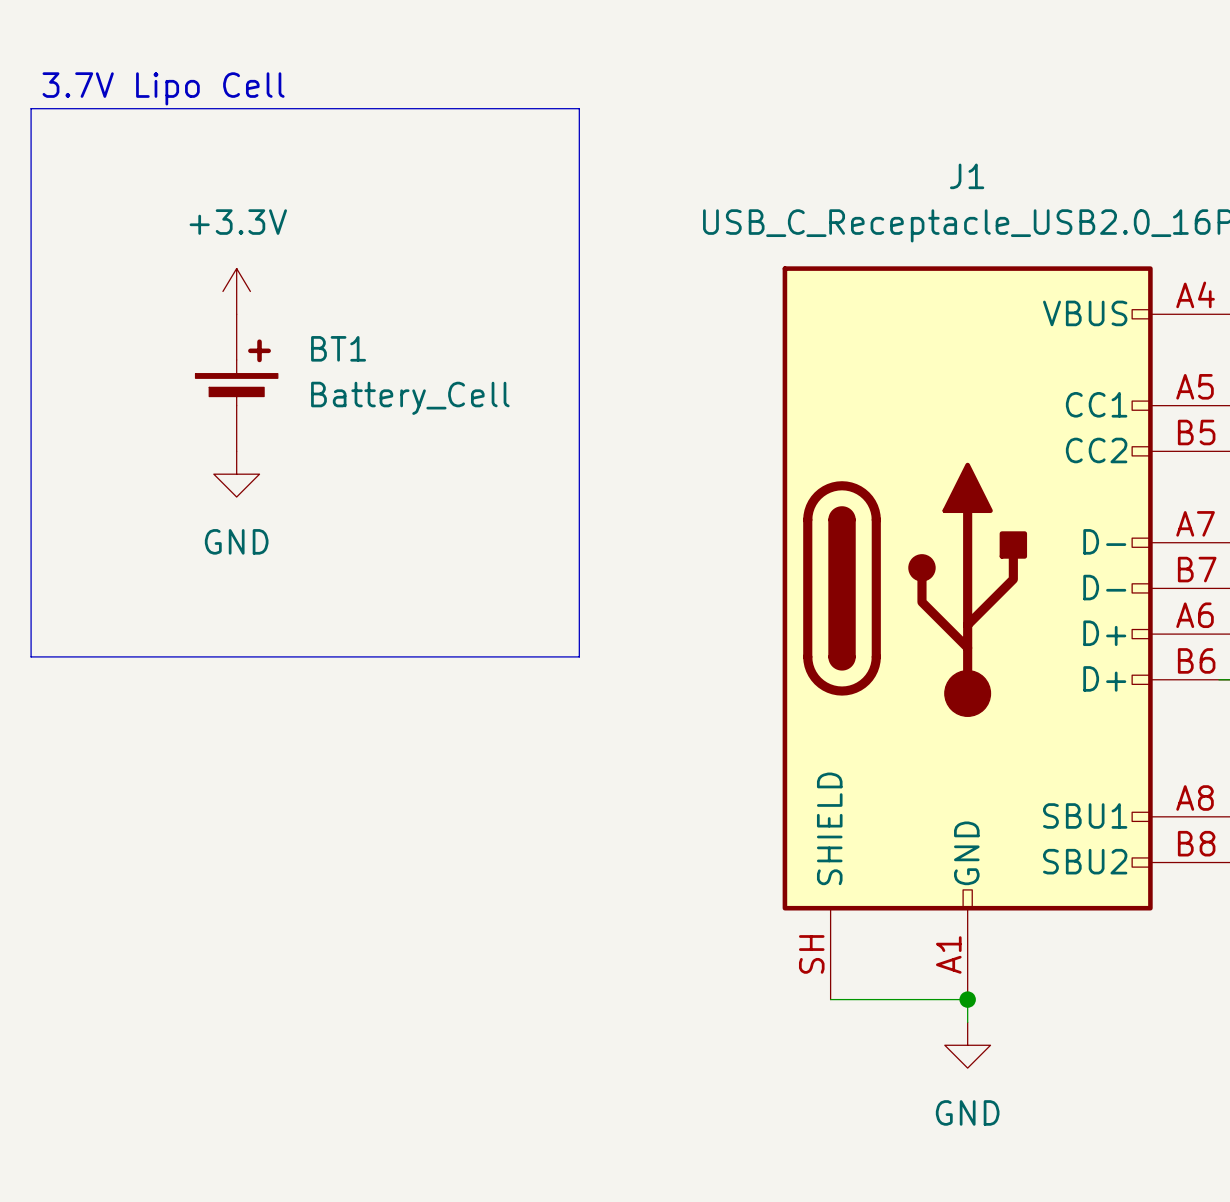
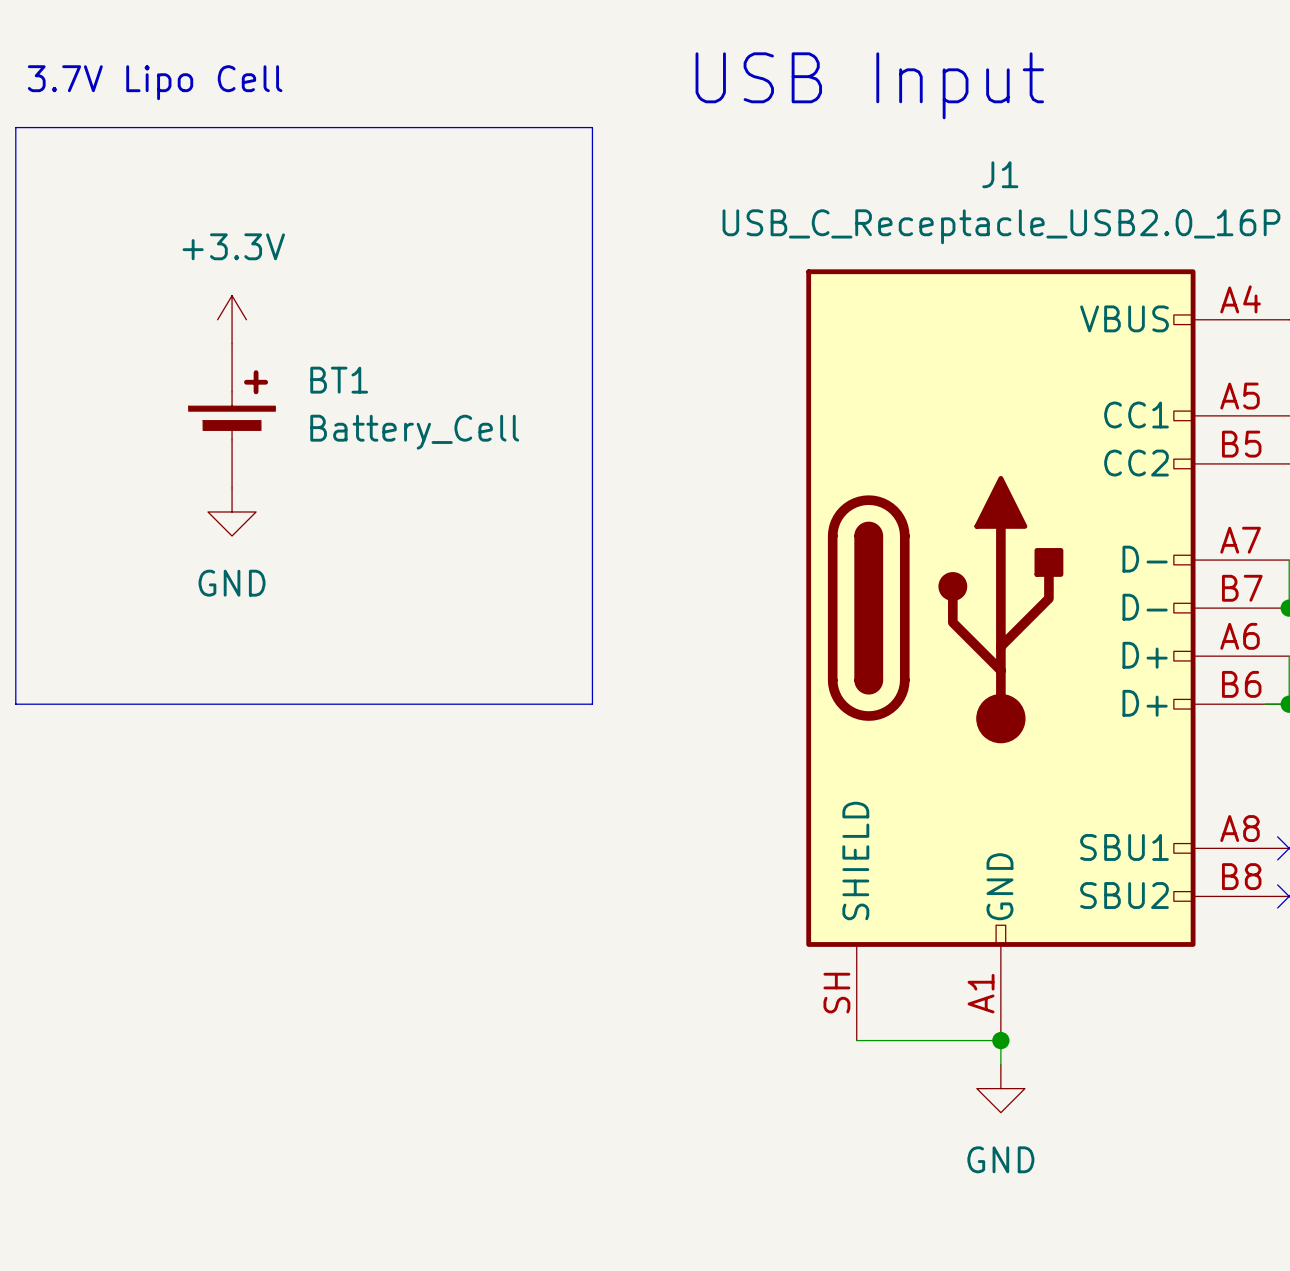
text: none -> USB Input (869, 85)
line: (31, 131) (31, 108) (579, 108) (579, 131) -> (15, 127) (592, 127)
power symbol position: +3.3V (236, 291) -> +3.3V (232, 319)
BT1 position: (236, 382) -> (232, 415)
power symbol position: GND (236, 474) -> GND (232, 511)
line: (31, 656) (579, 656) -> (15, 680) (15, 704) (592, 704) (592, 680)

